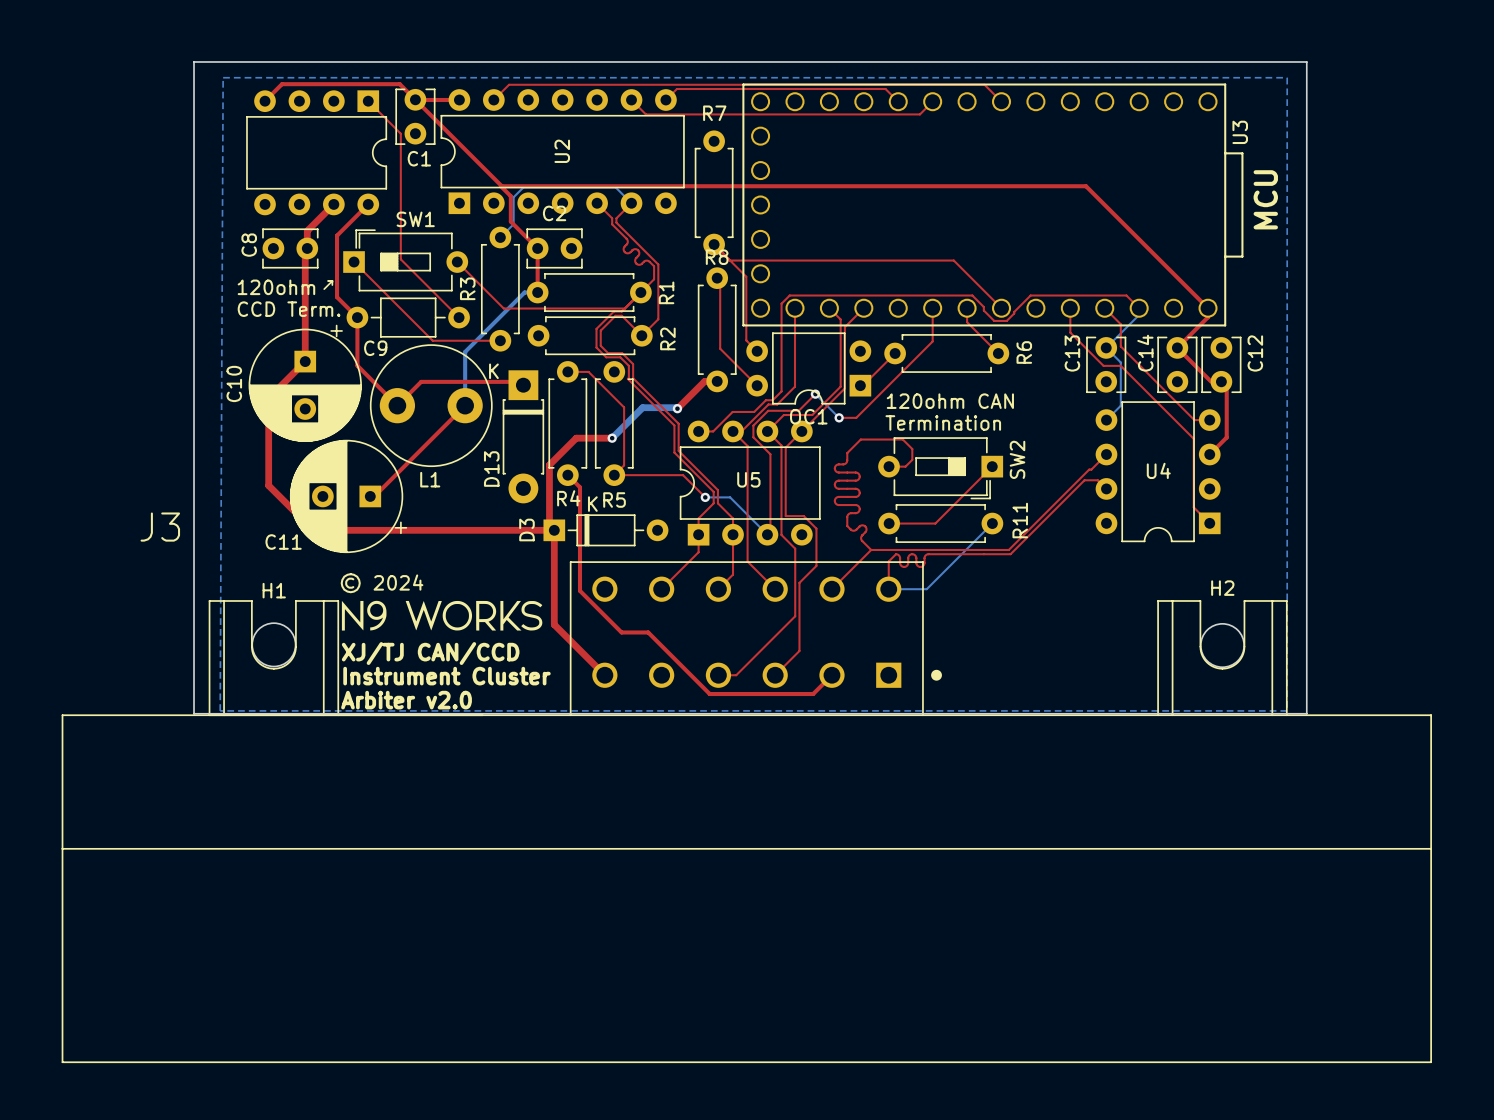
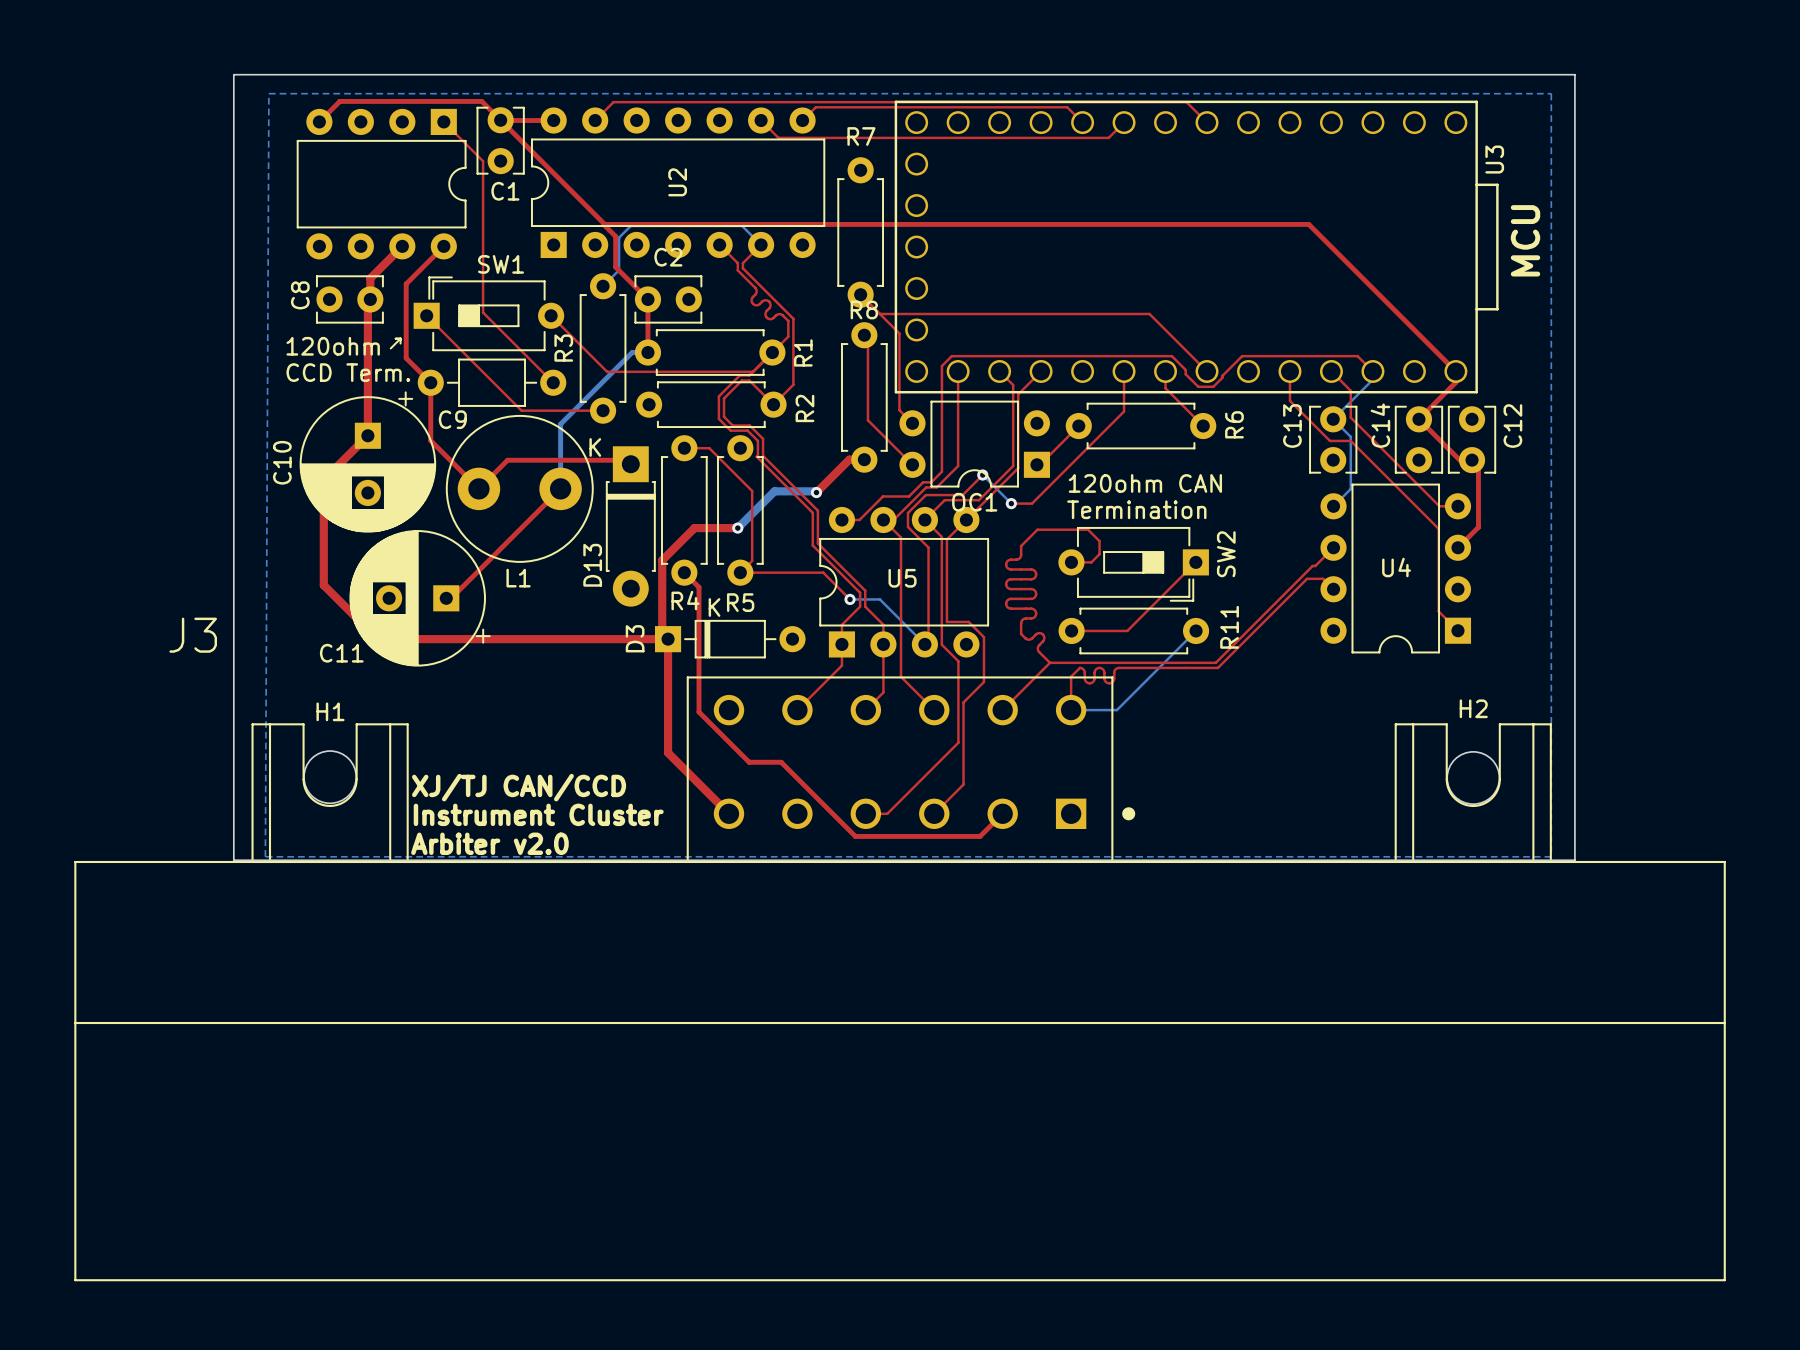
text: © 2024 (382, 583) -> none
drawing: [341, 600, 543, 631] -> none

